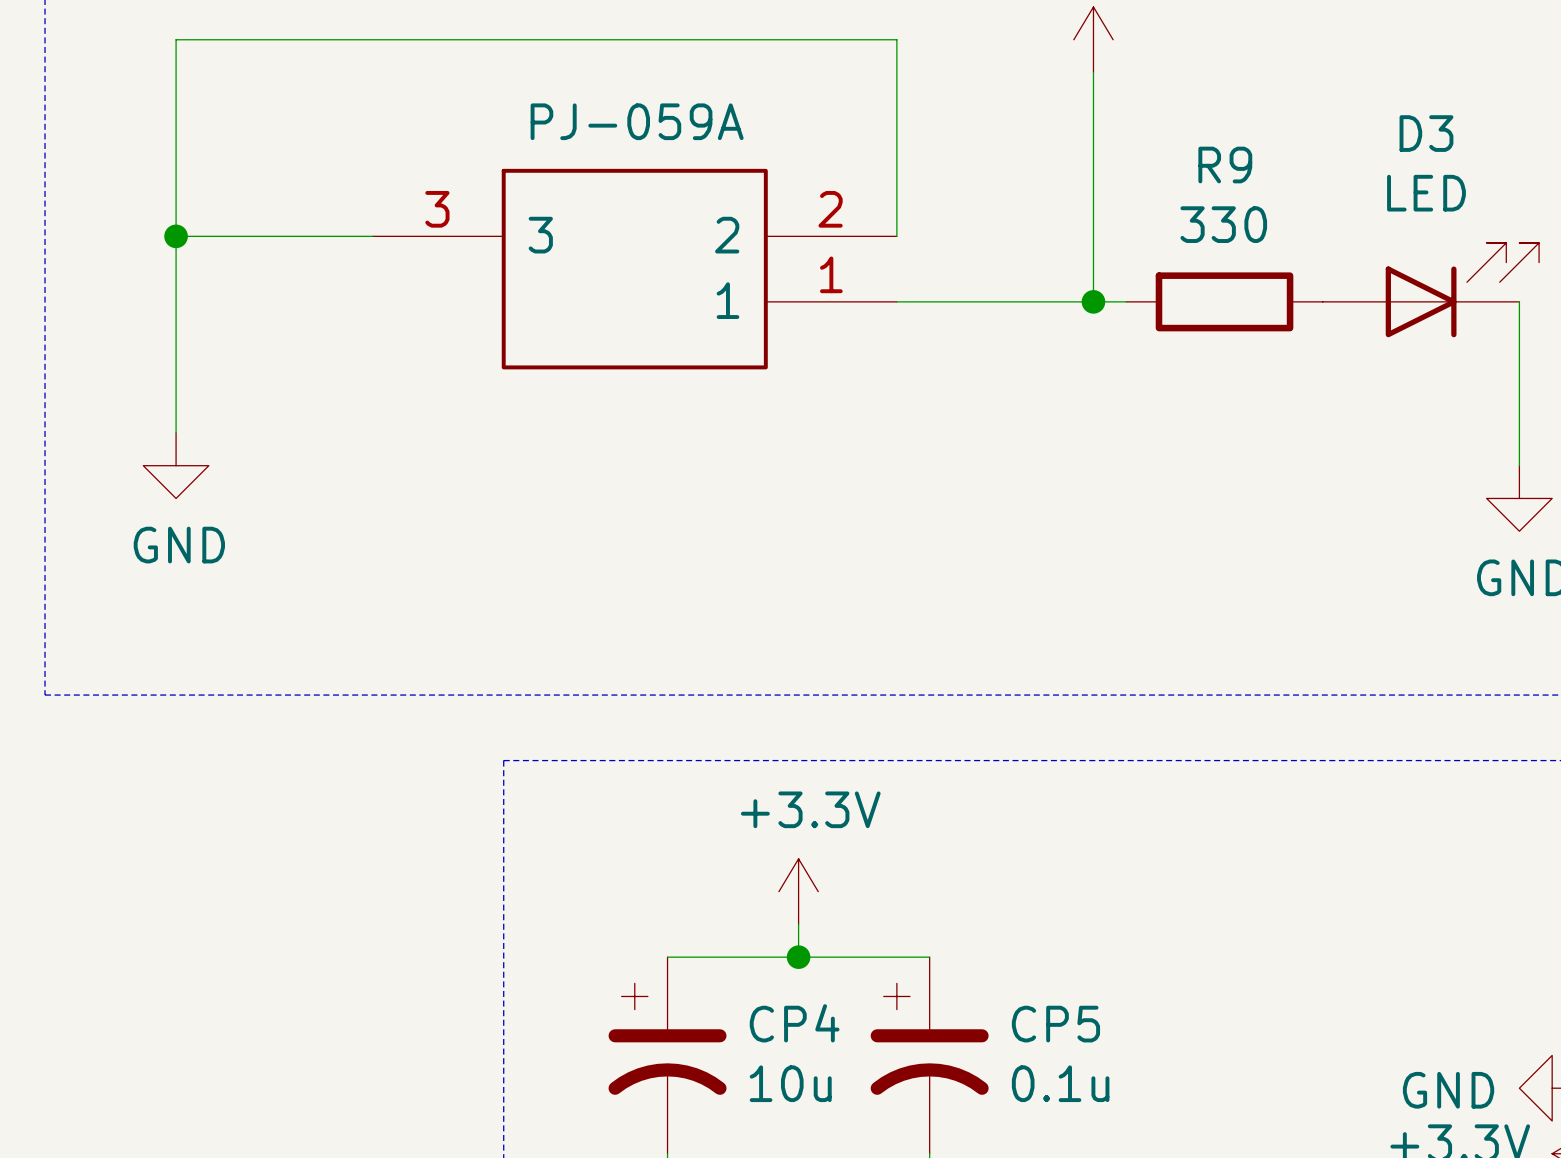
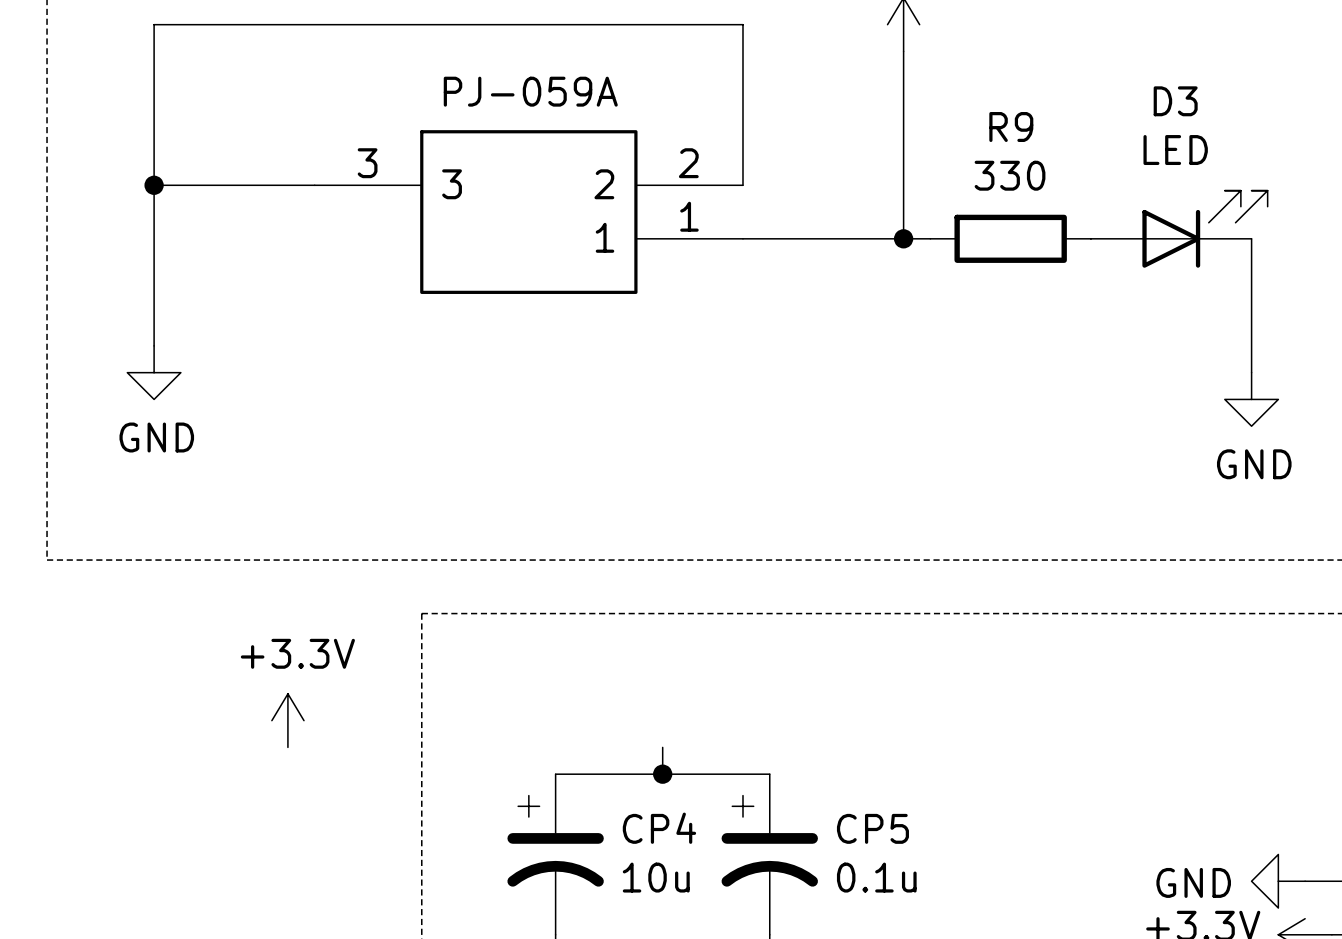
power symbol position: +3.3V (798, 891) -> +3.3V (287, 720)

